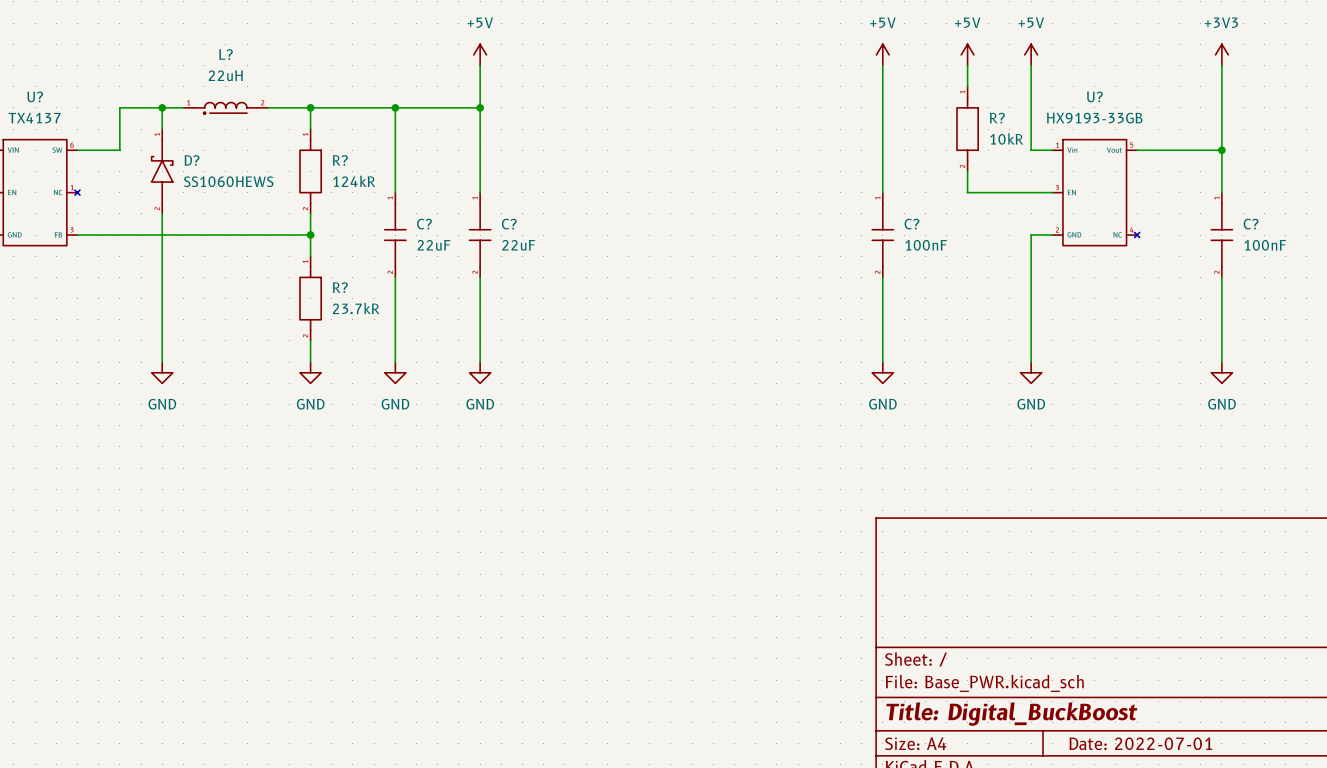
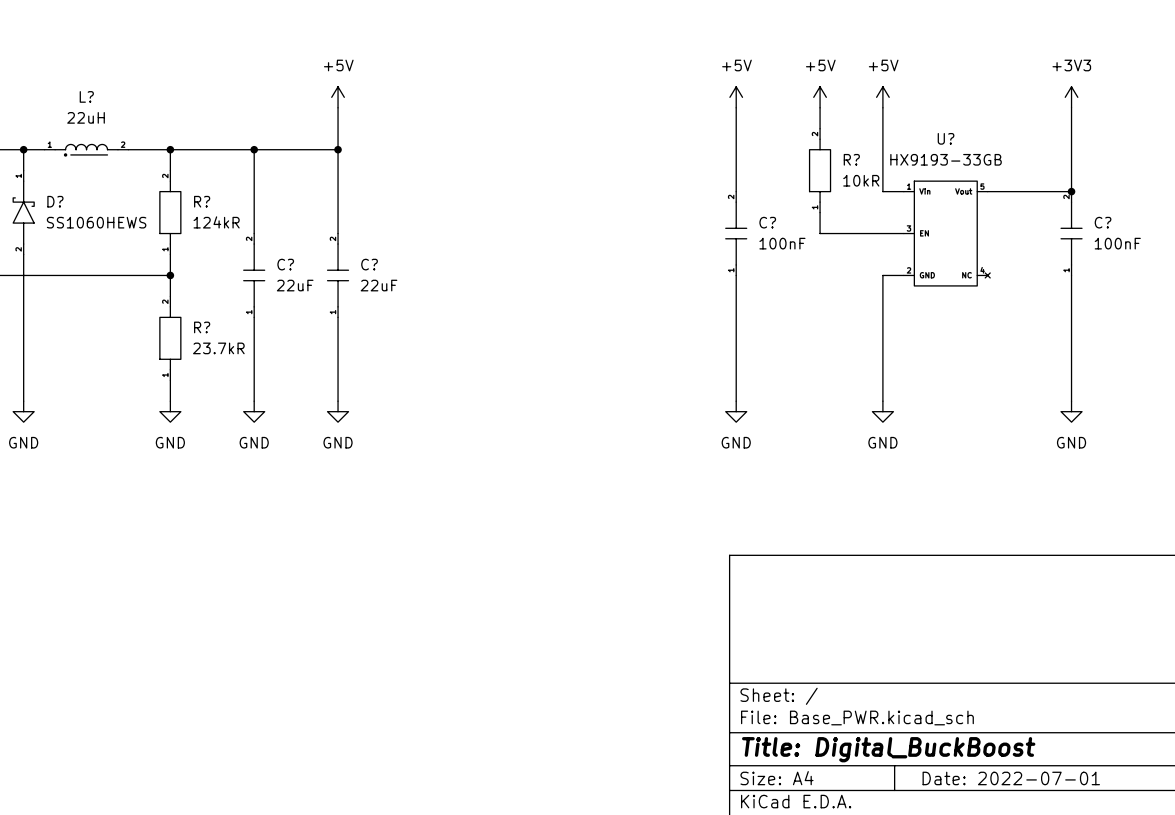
R? rotation: 0° (967, 129) -> 180° (820, 170)
R? rotation: 0° (310, 171) -> 180° (170, 212)
C? rotation: 0° (395, 235) -> 180° (254, 275)
C? rotation: 0° (480, 235) -> 180° (338, 275)
C? rotation: 0° (882, 235) -> 180° (736, 233)
C? rotation: 0° (1221, 235) -> 180° (1071, 233)
R? rotation: 0° (310, 298) -> 180° (170, 338)

